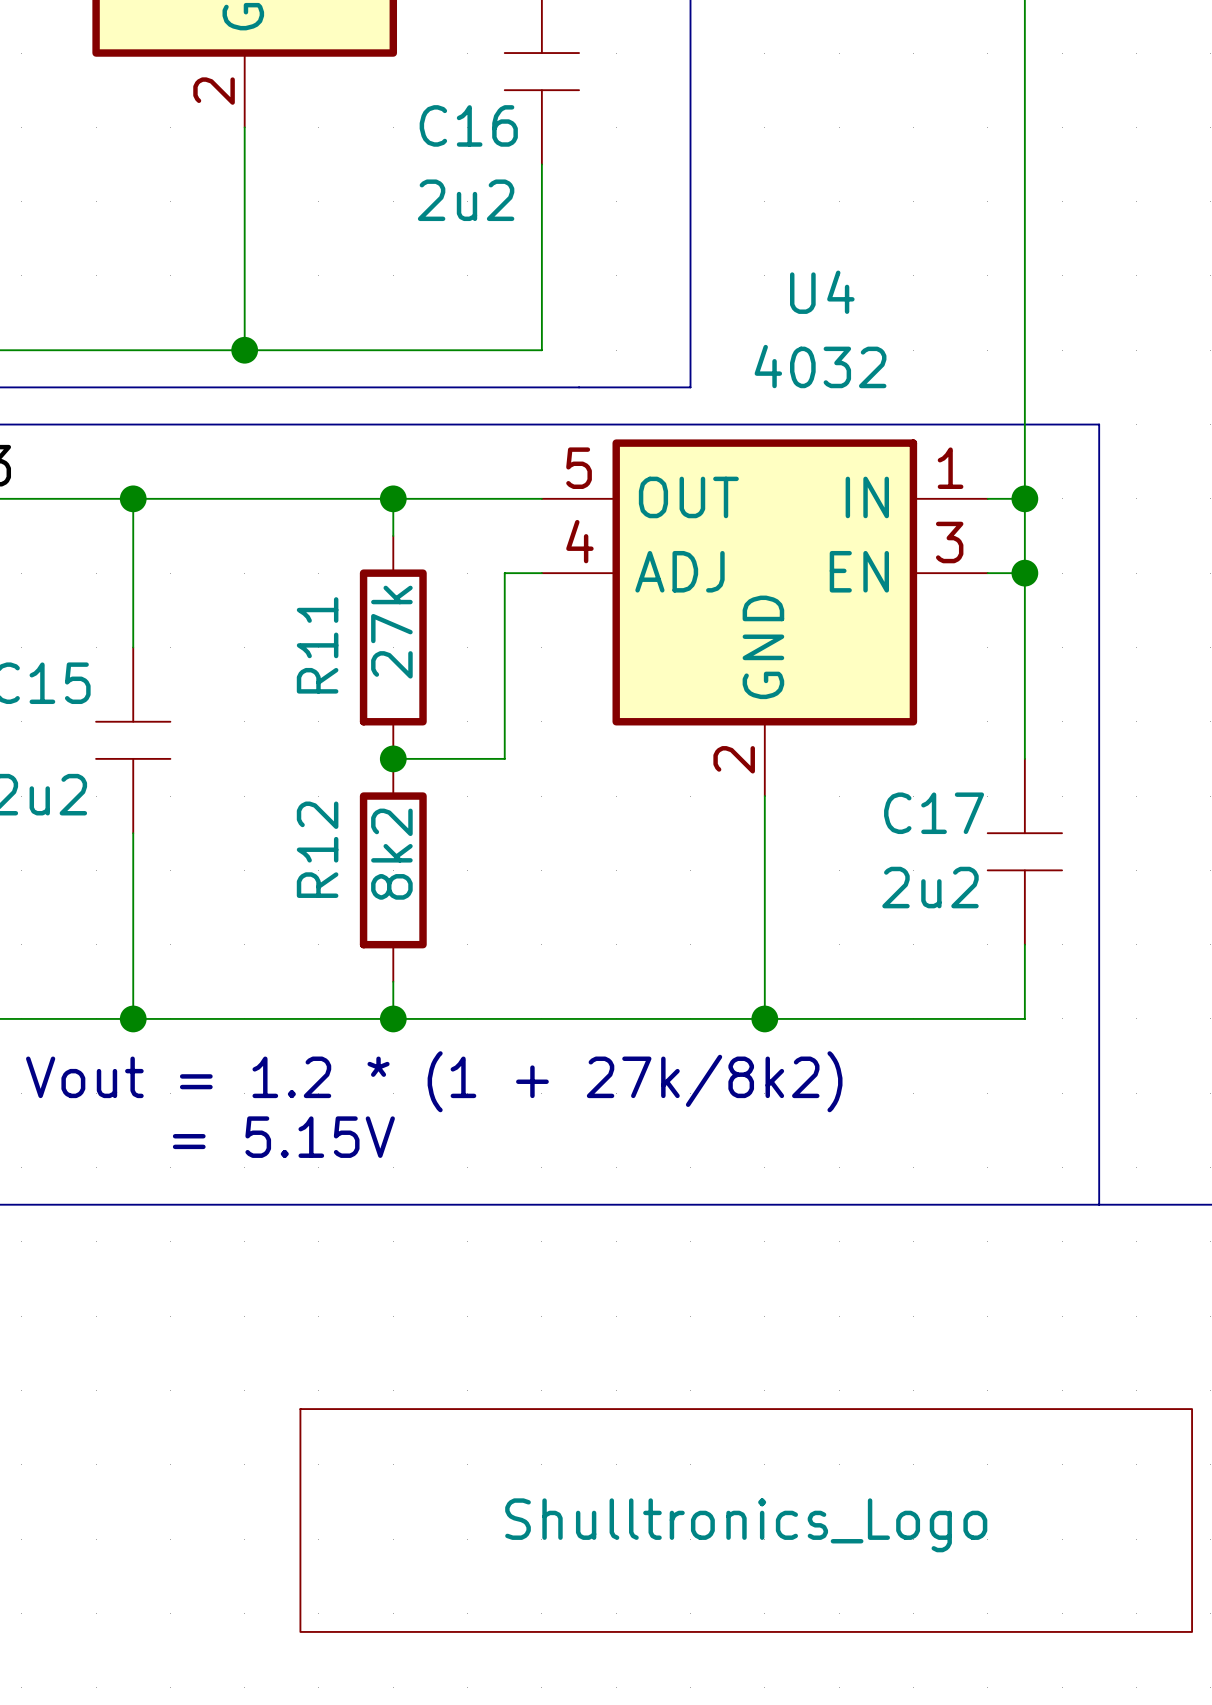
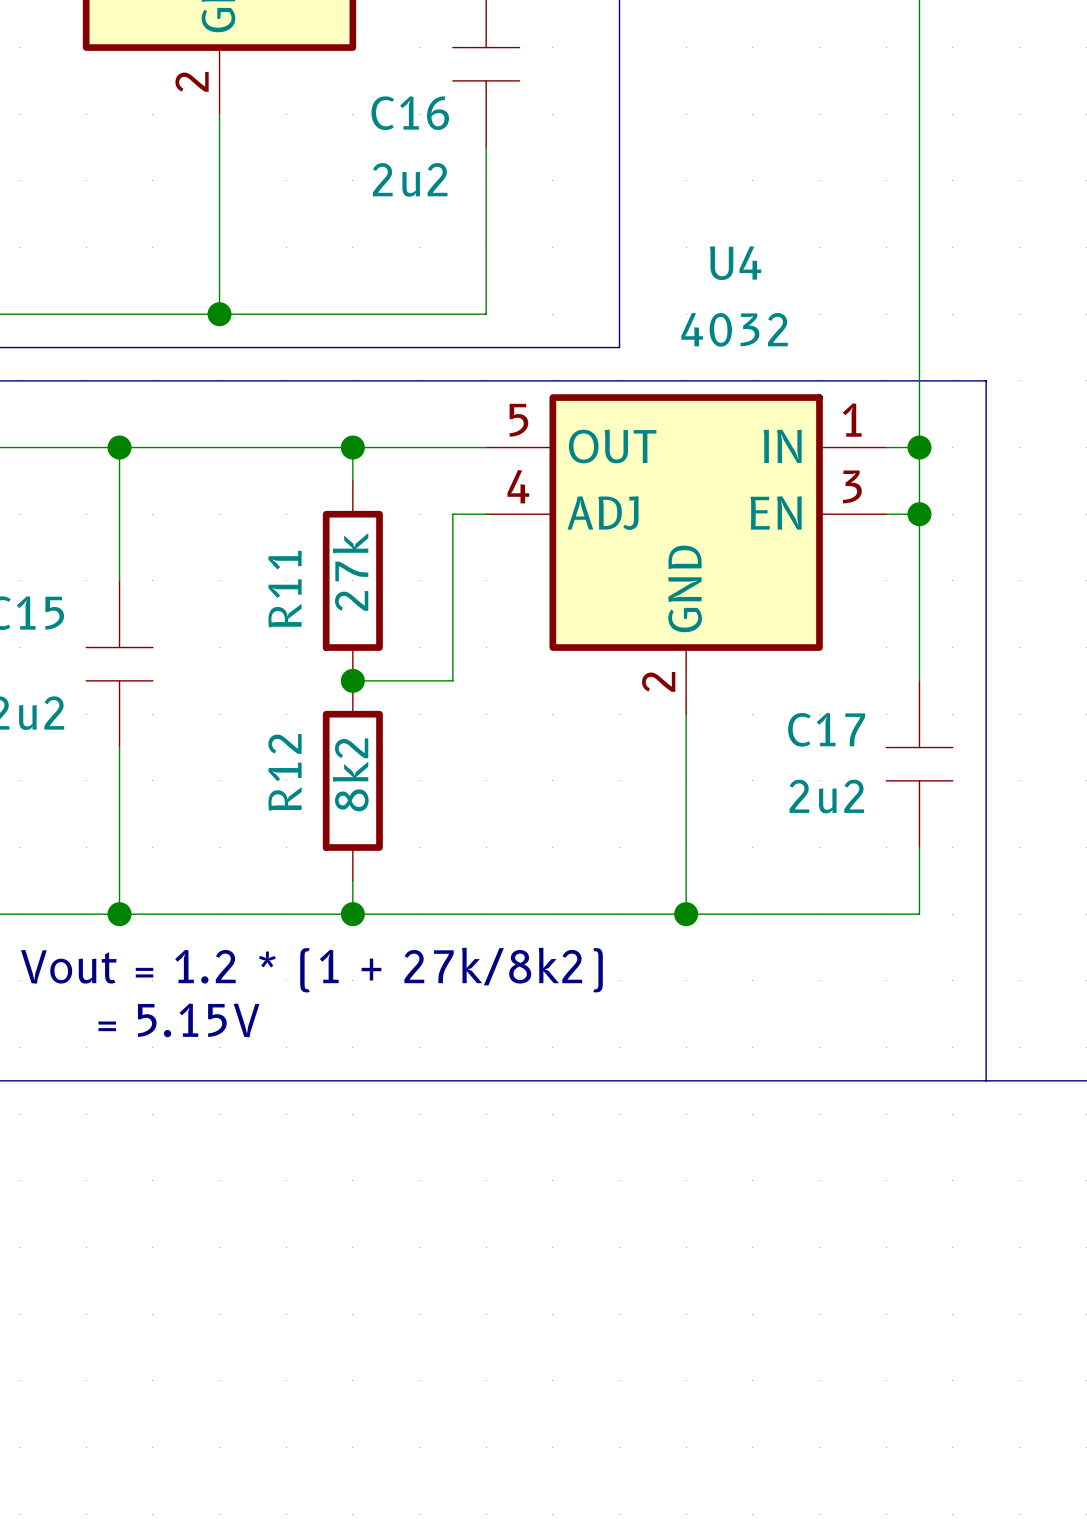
part: Shulltronics_Logo (746, 1520) -> none

